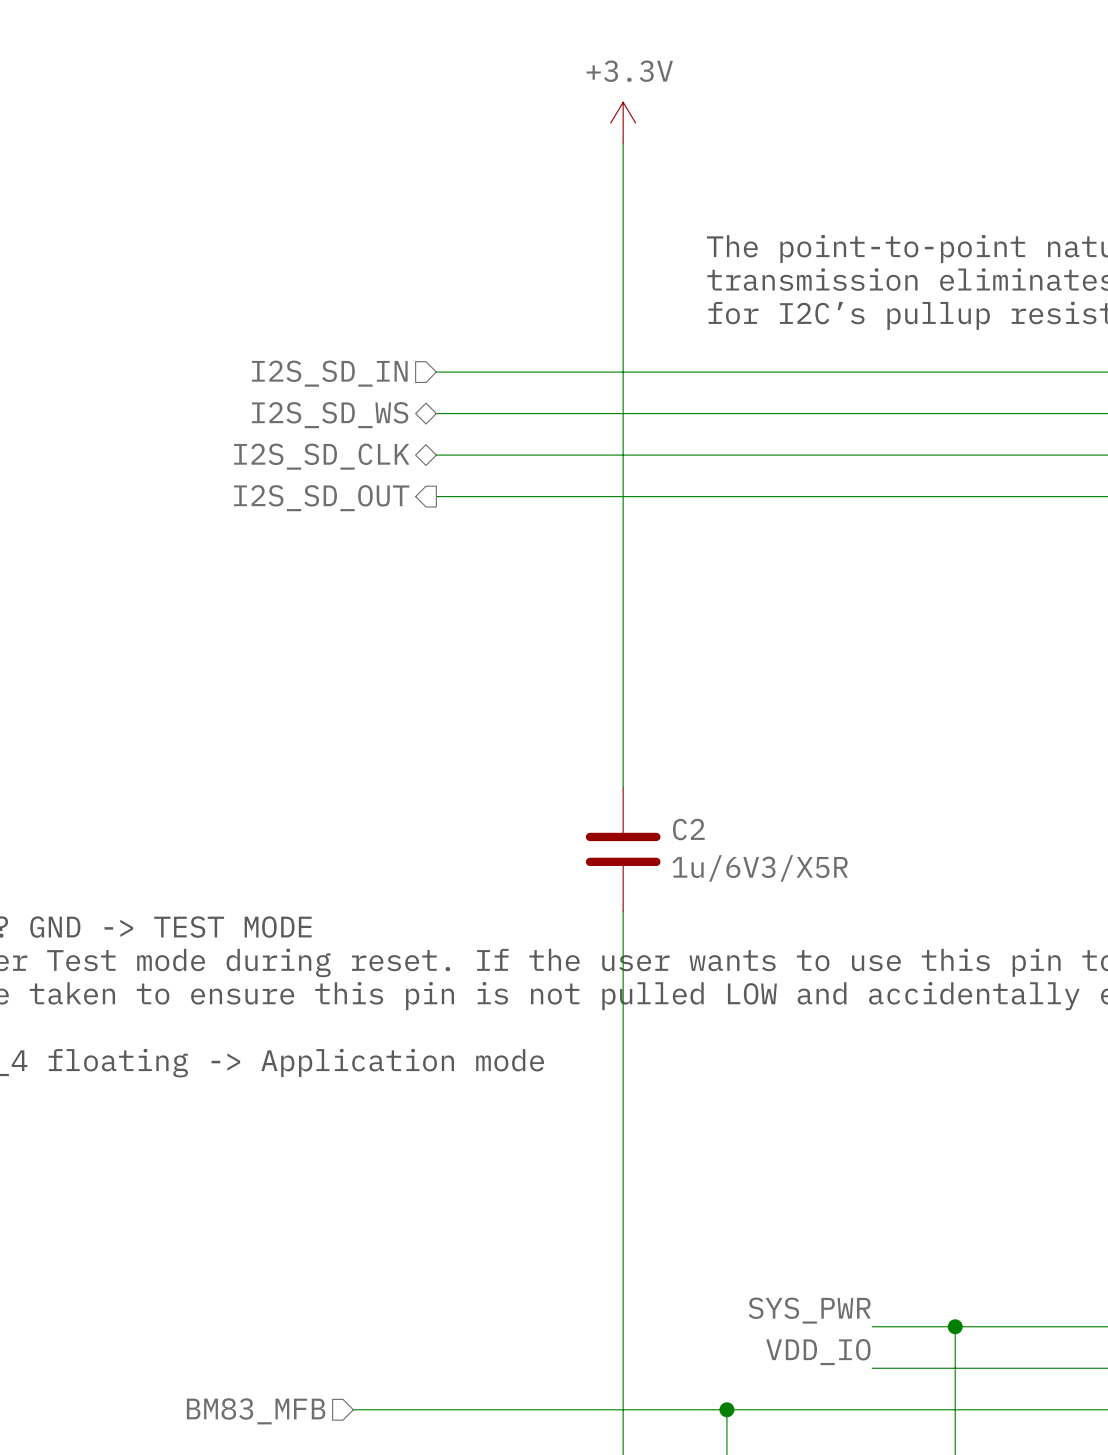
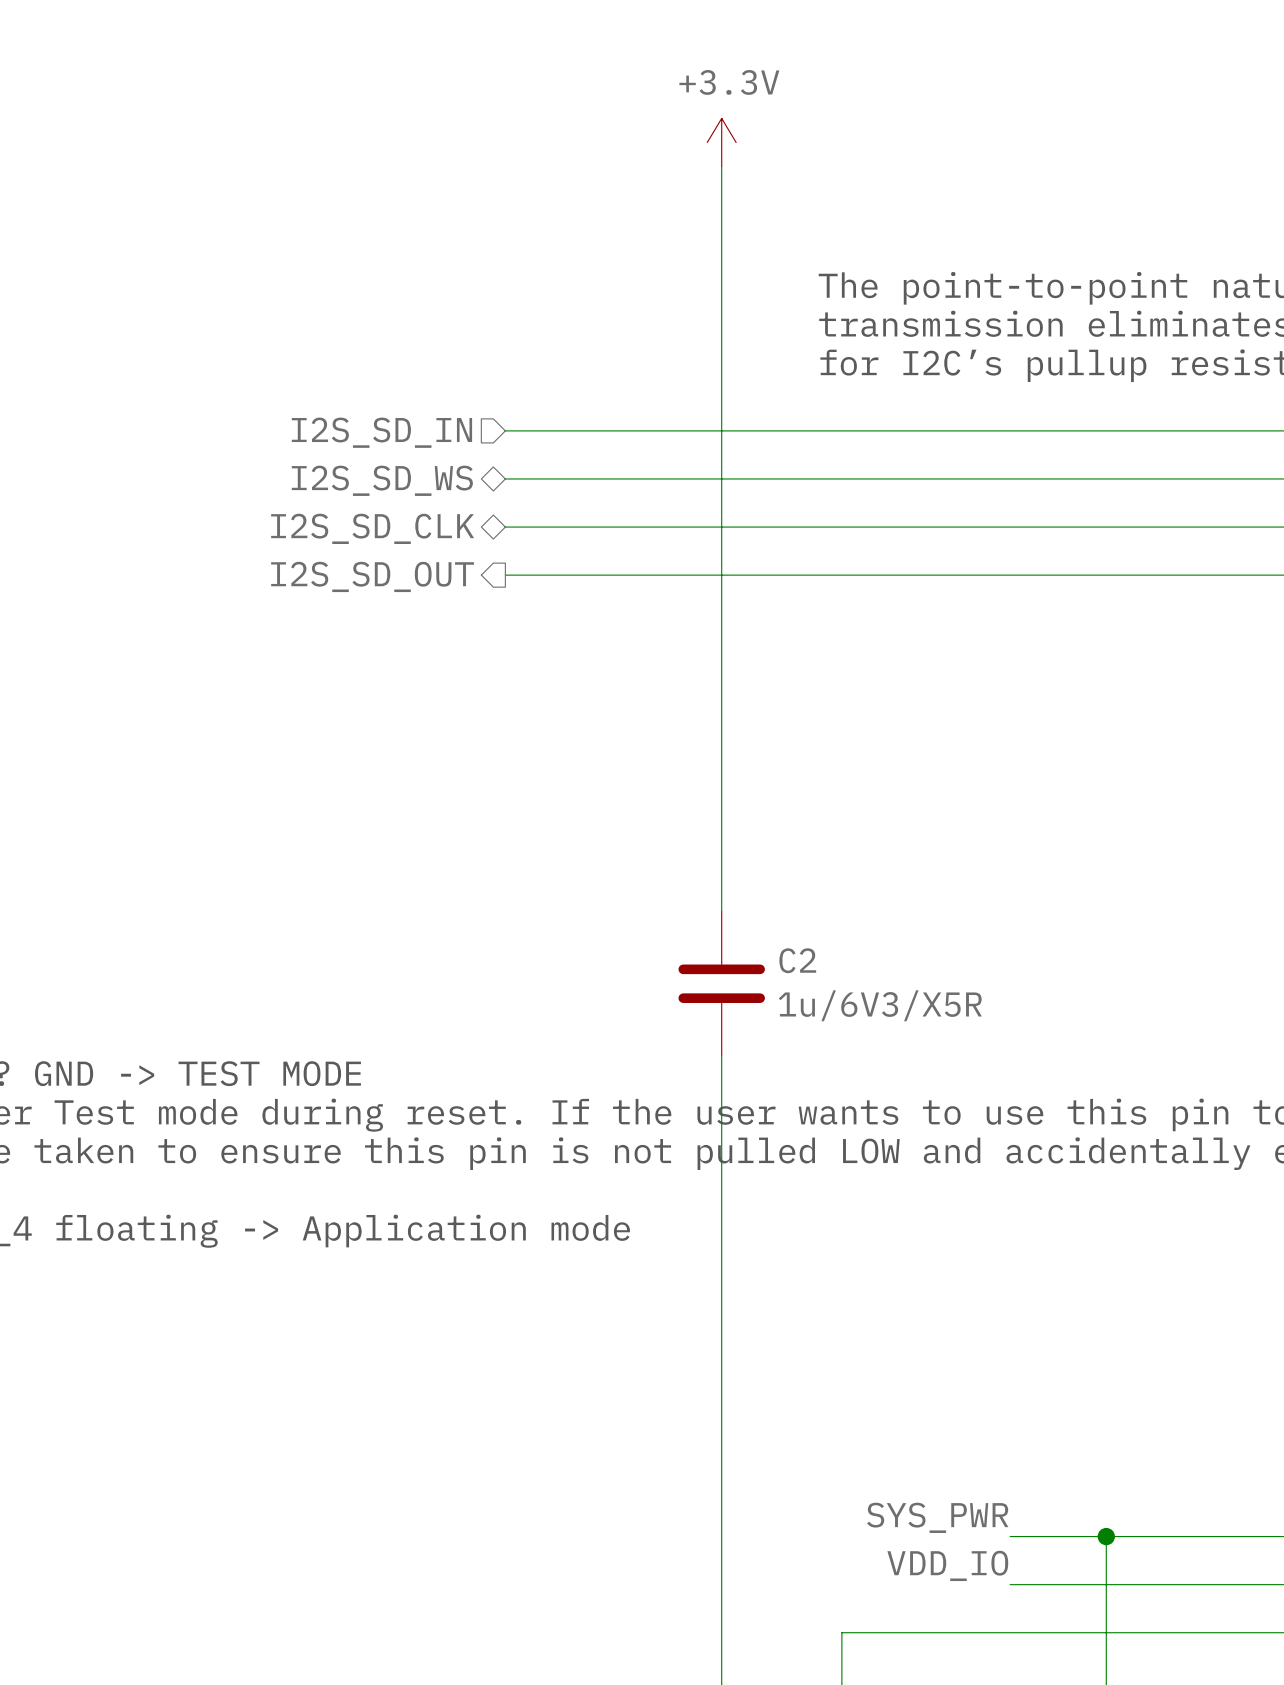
wire: (353, 1409) (726, 1409) -> none
junction: (726, 1409) -> none
hierarchical label: BM83_MFB (256, 1411) -> none

